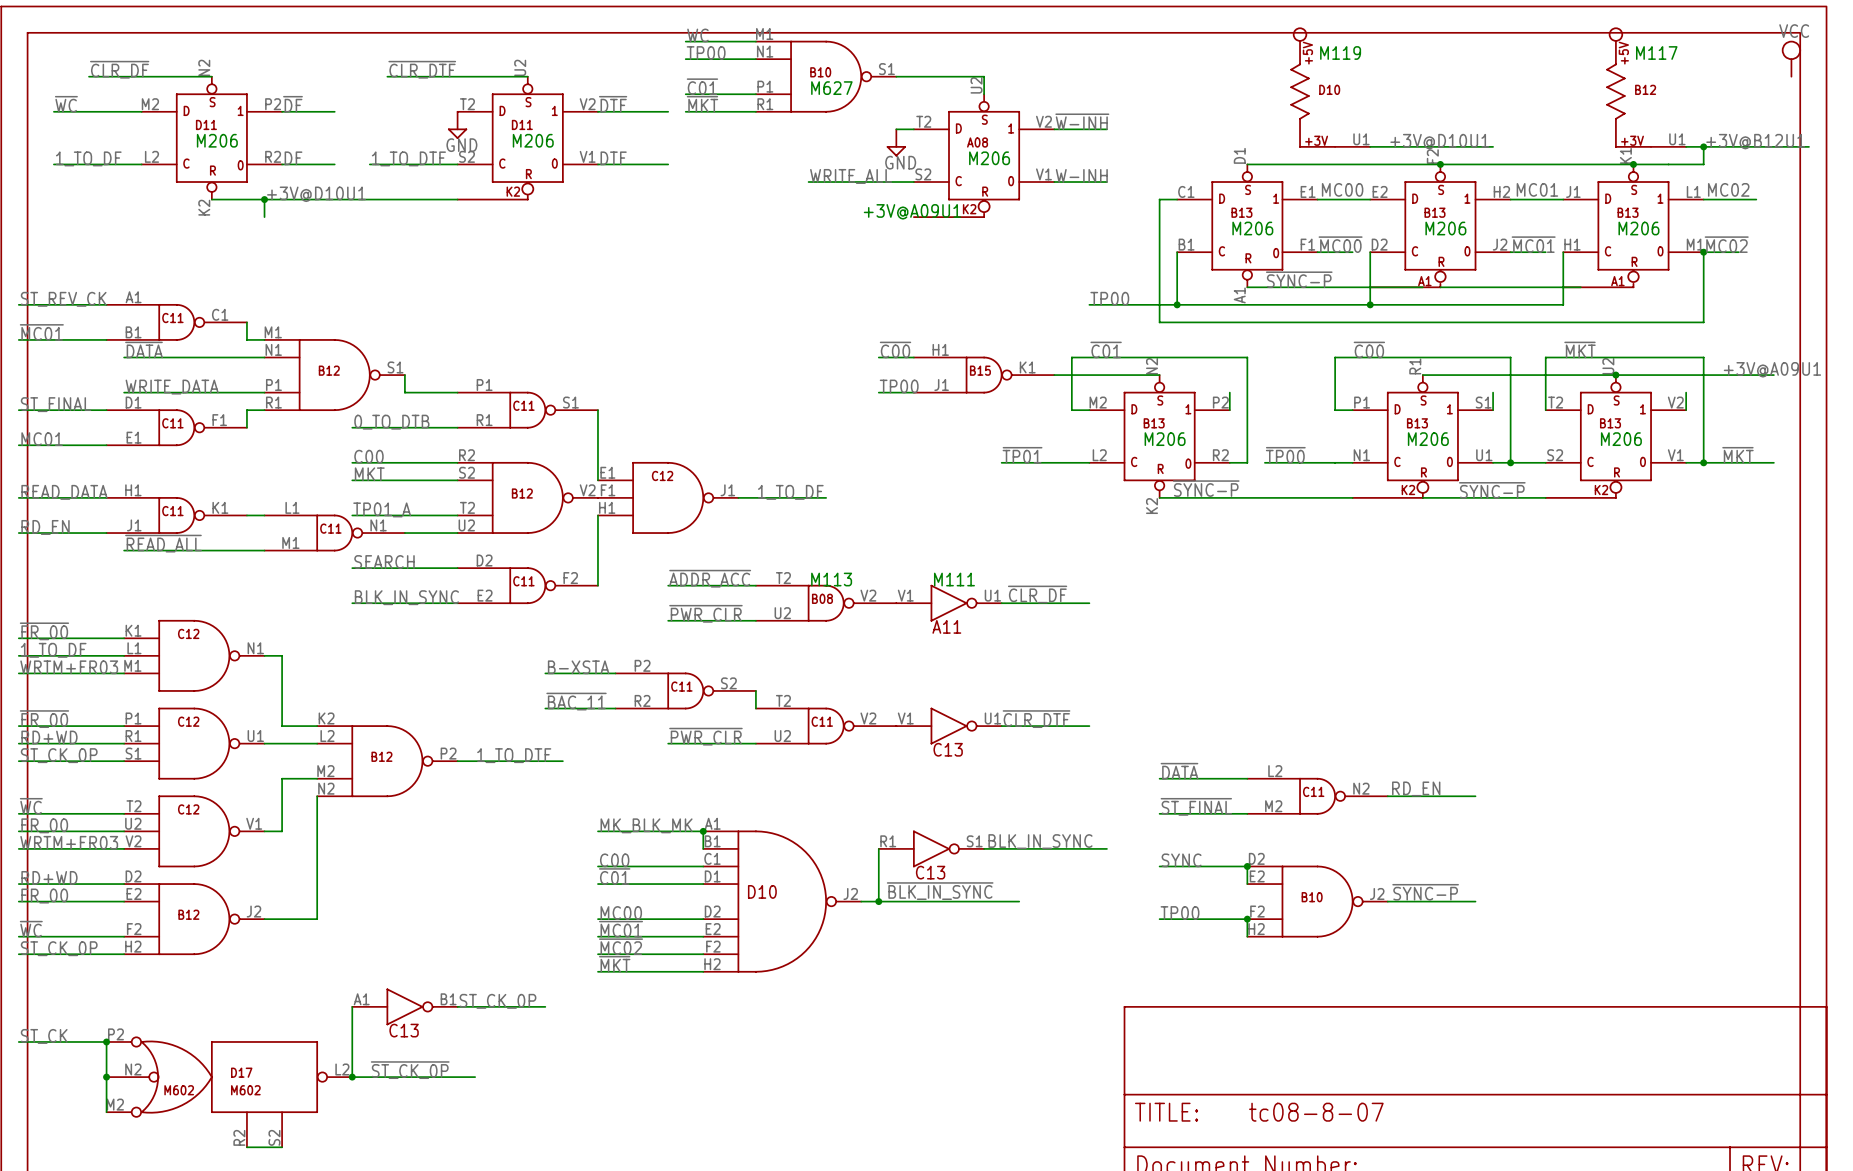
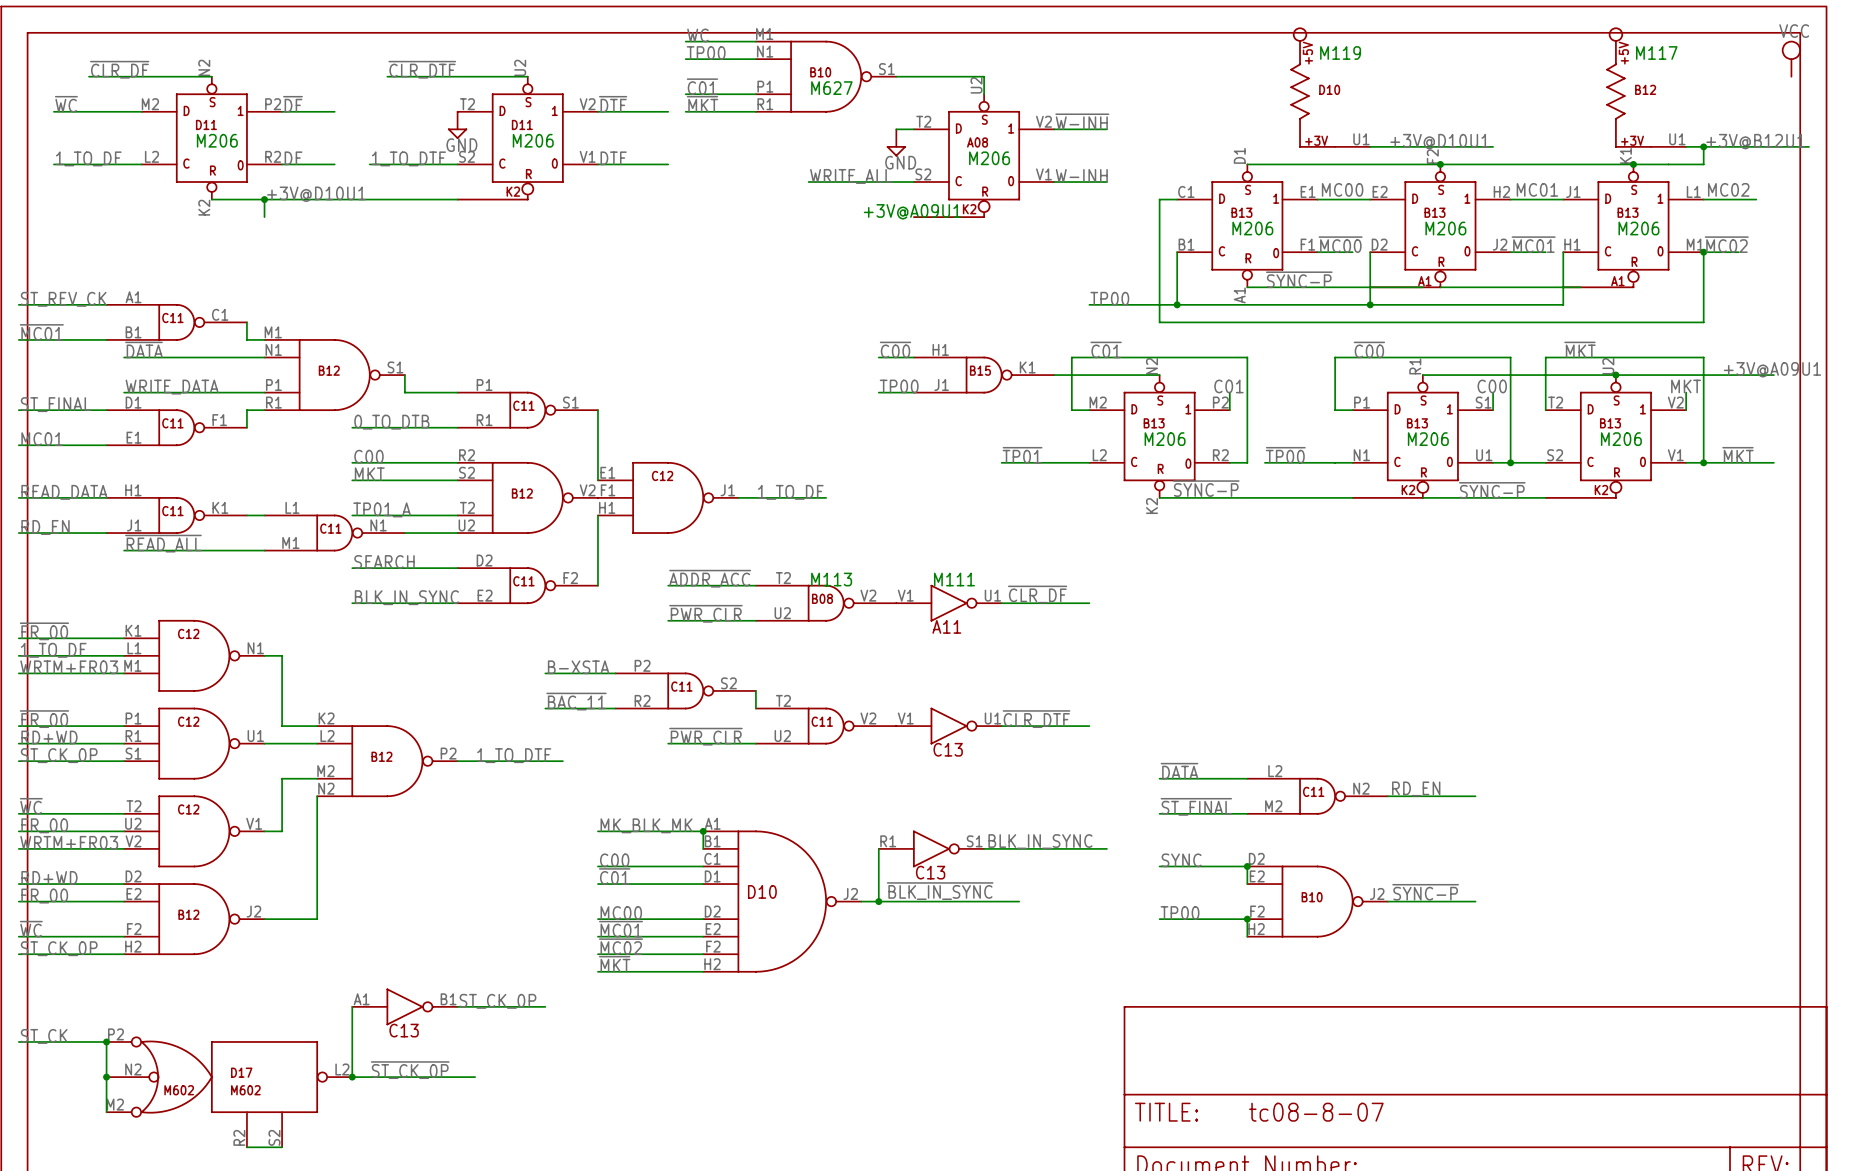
label: none -> C01 (1228, 386)
label: none -> C00 (1492, 386)
label: none -> MKT (1686, 386)

